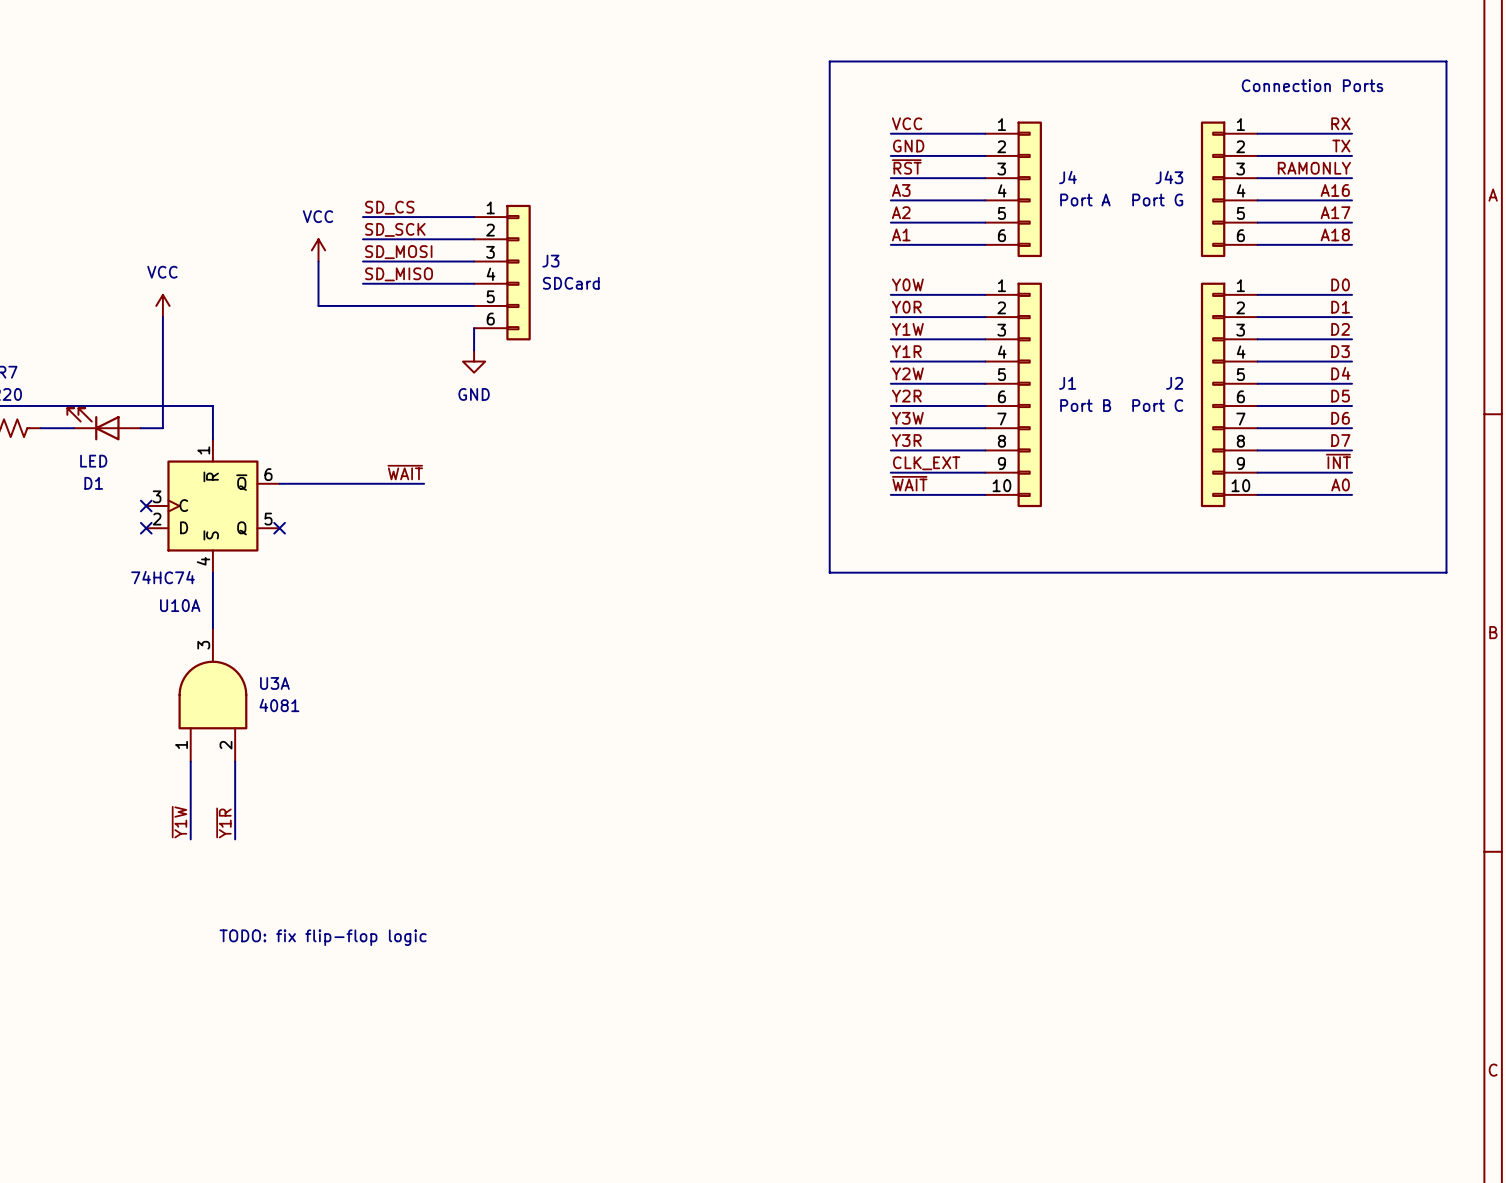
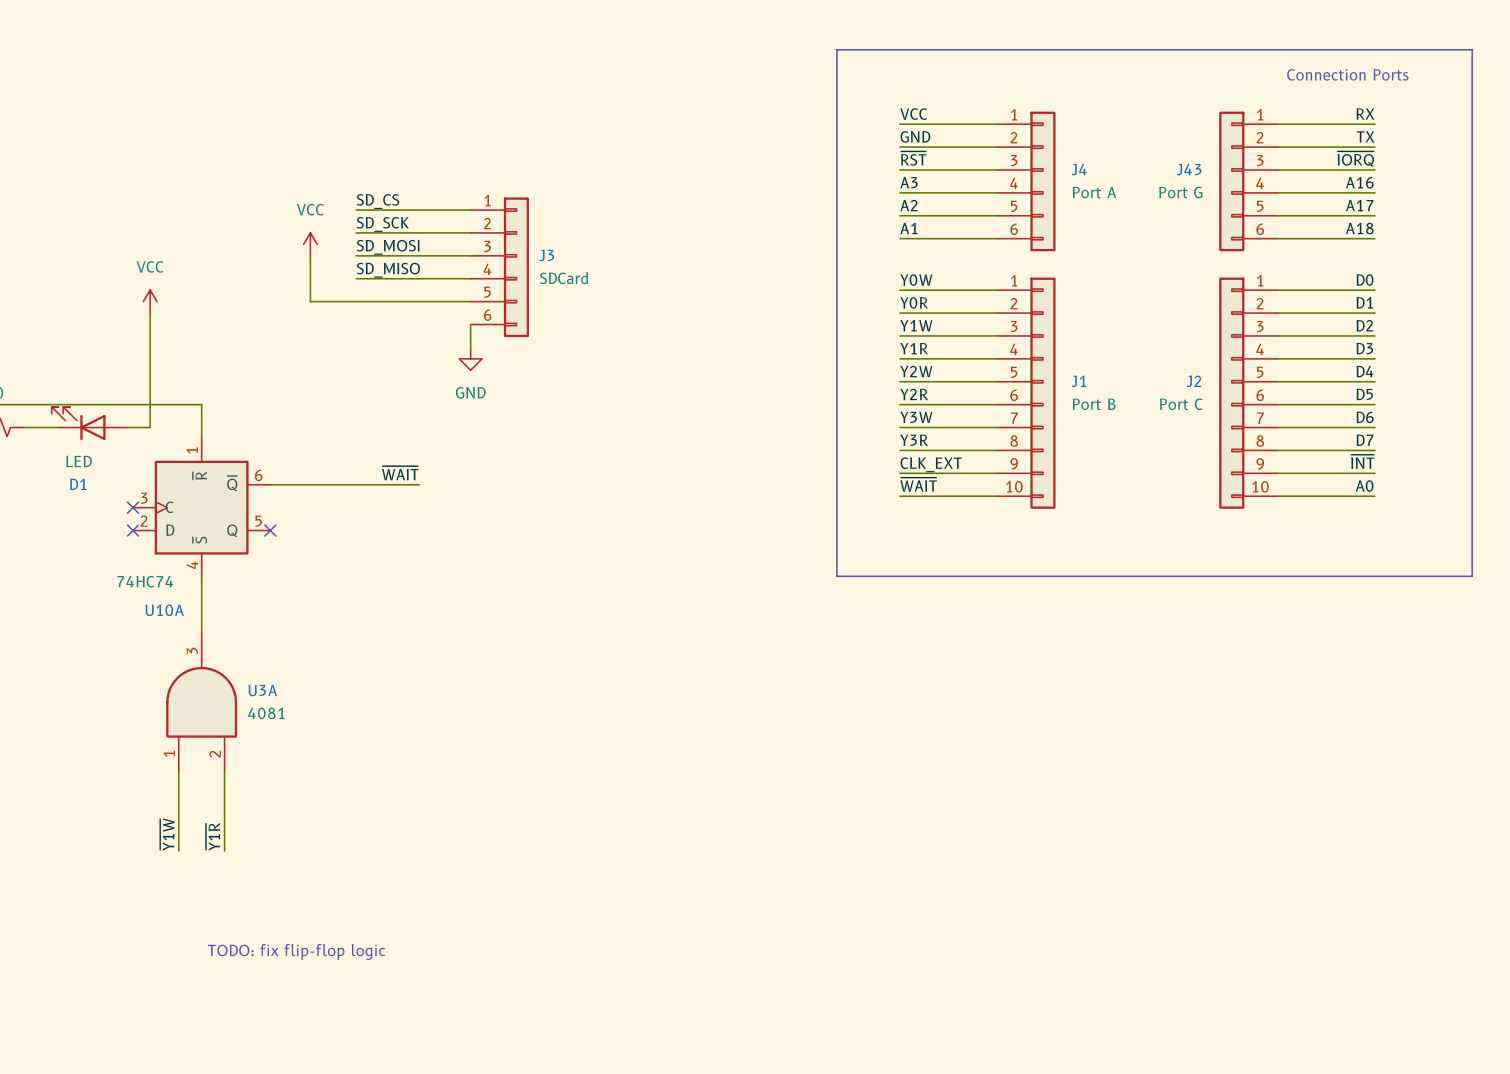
label: RAMONLY (1314, 168) -> ~{IORQ} (1355, 159)

